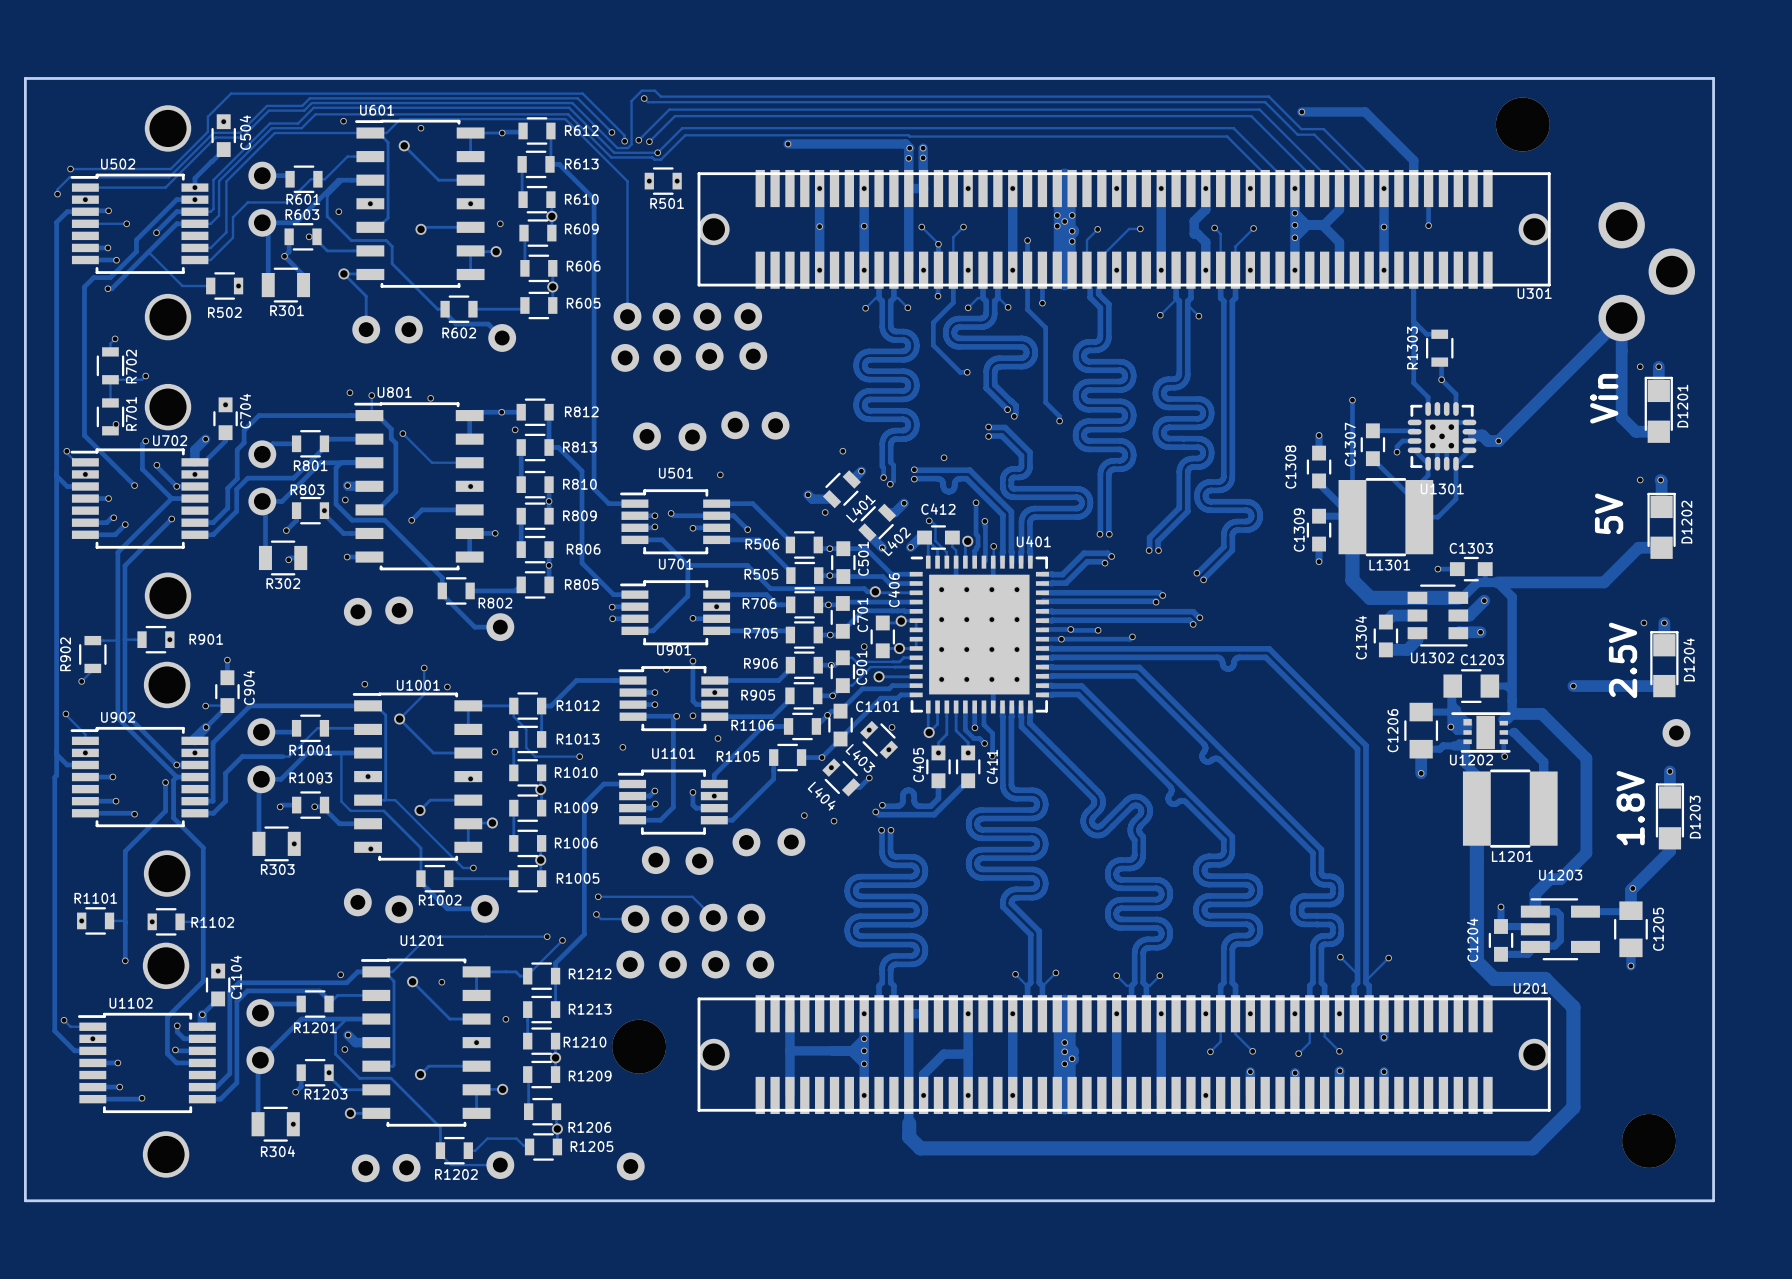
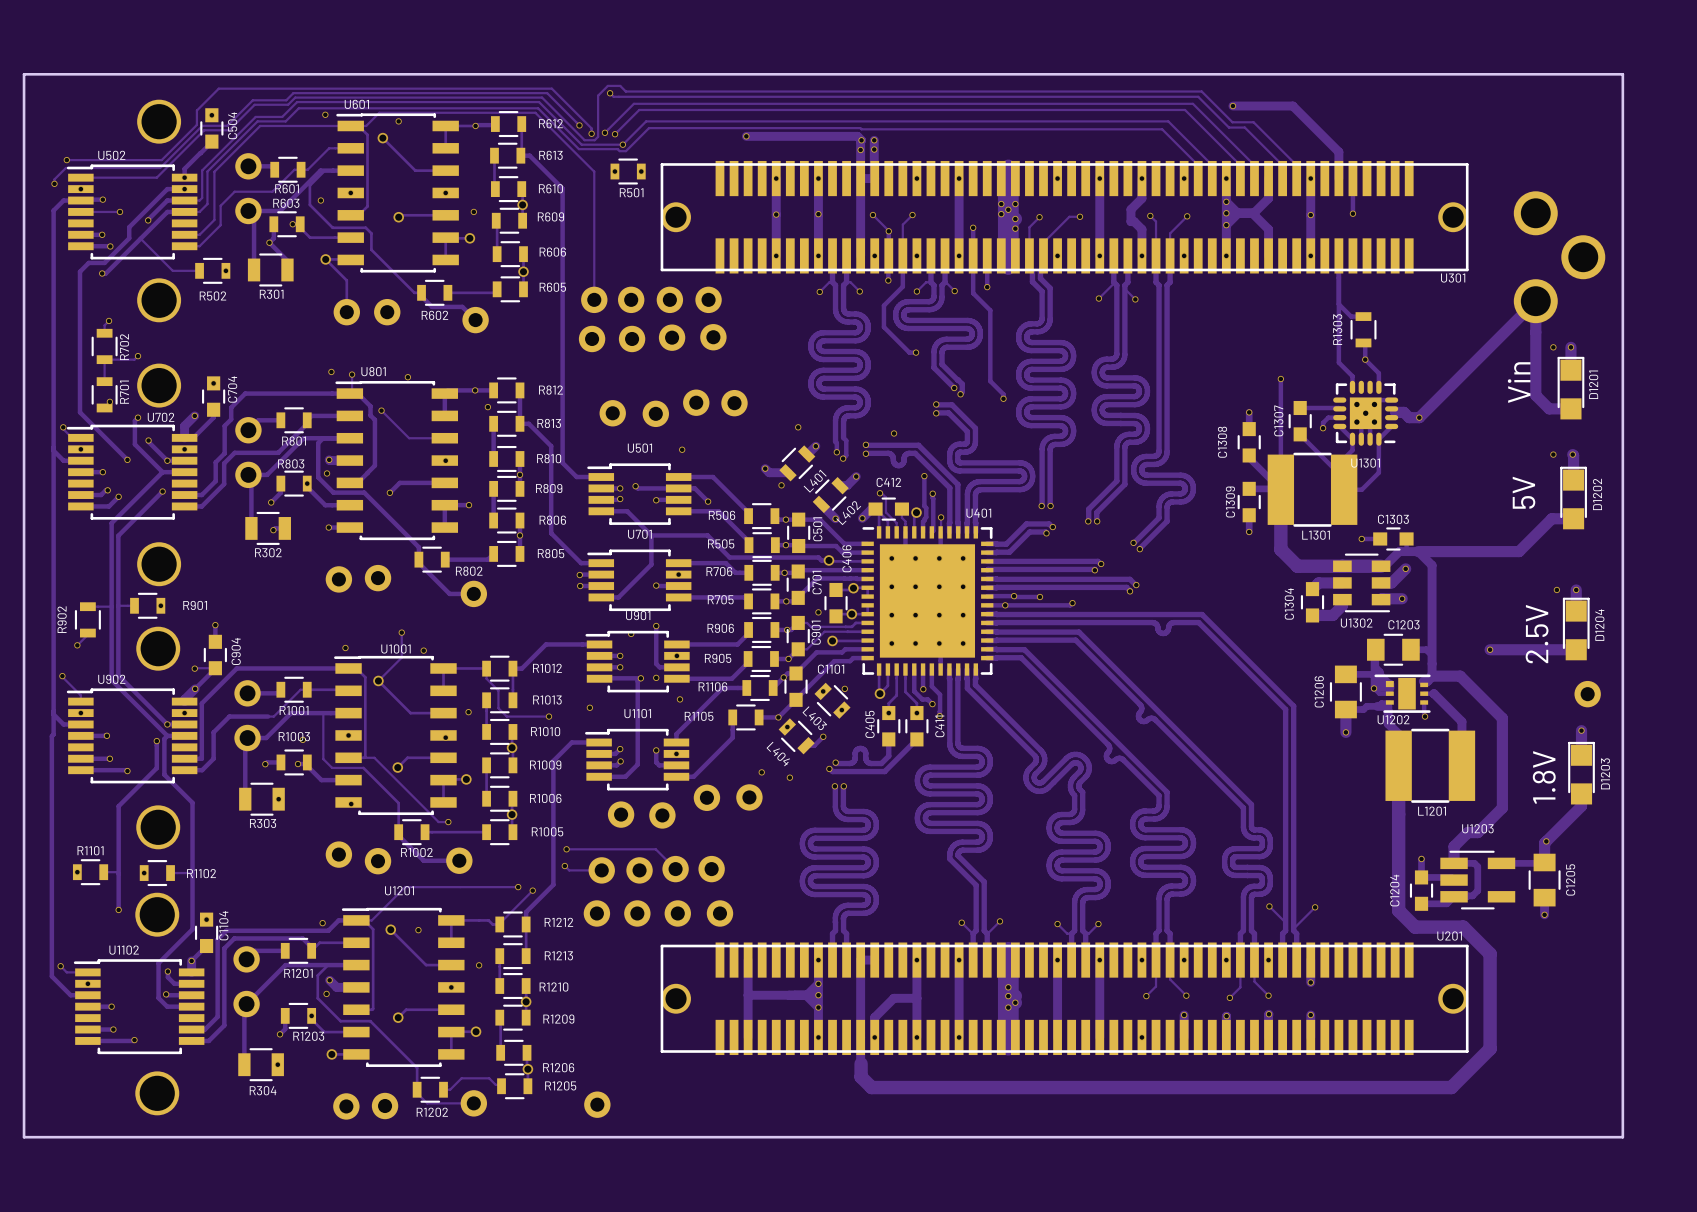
part: (1522, 124) -> none
part: (639, 1046) -> none
part: (1649, 1140) -> none

